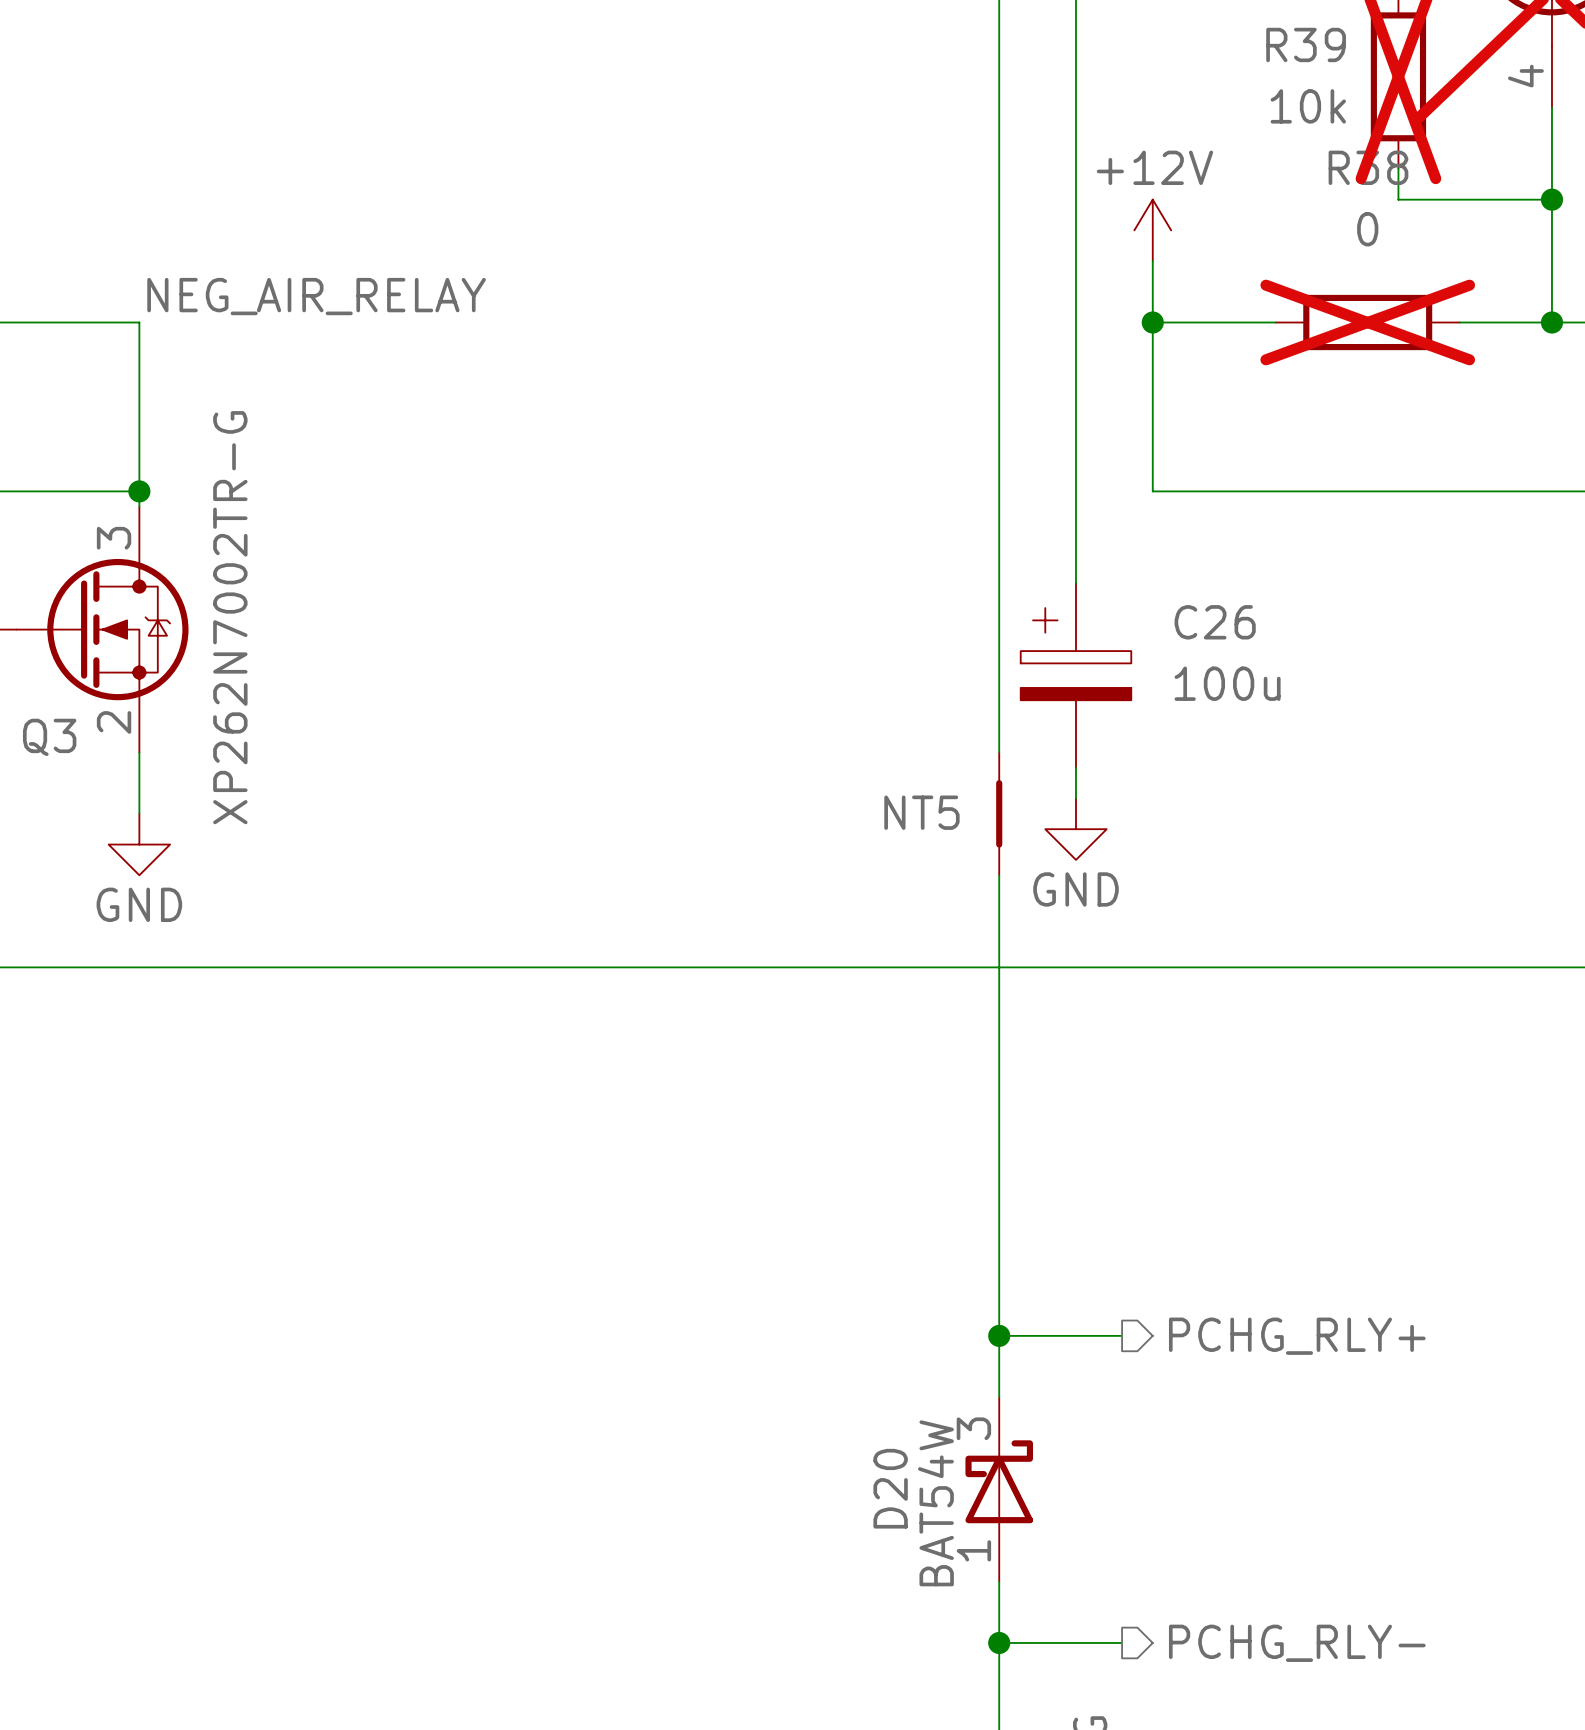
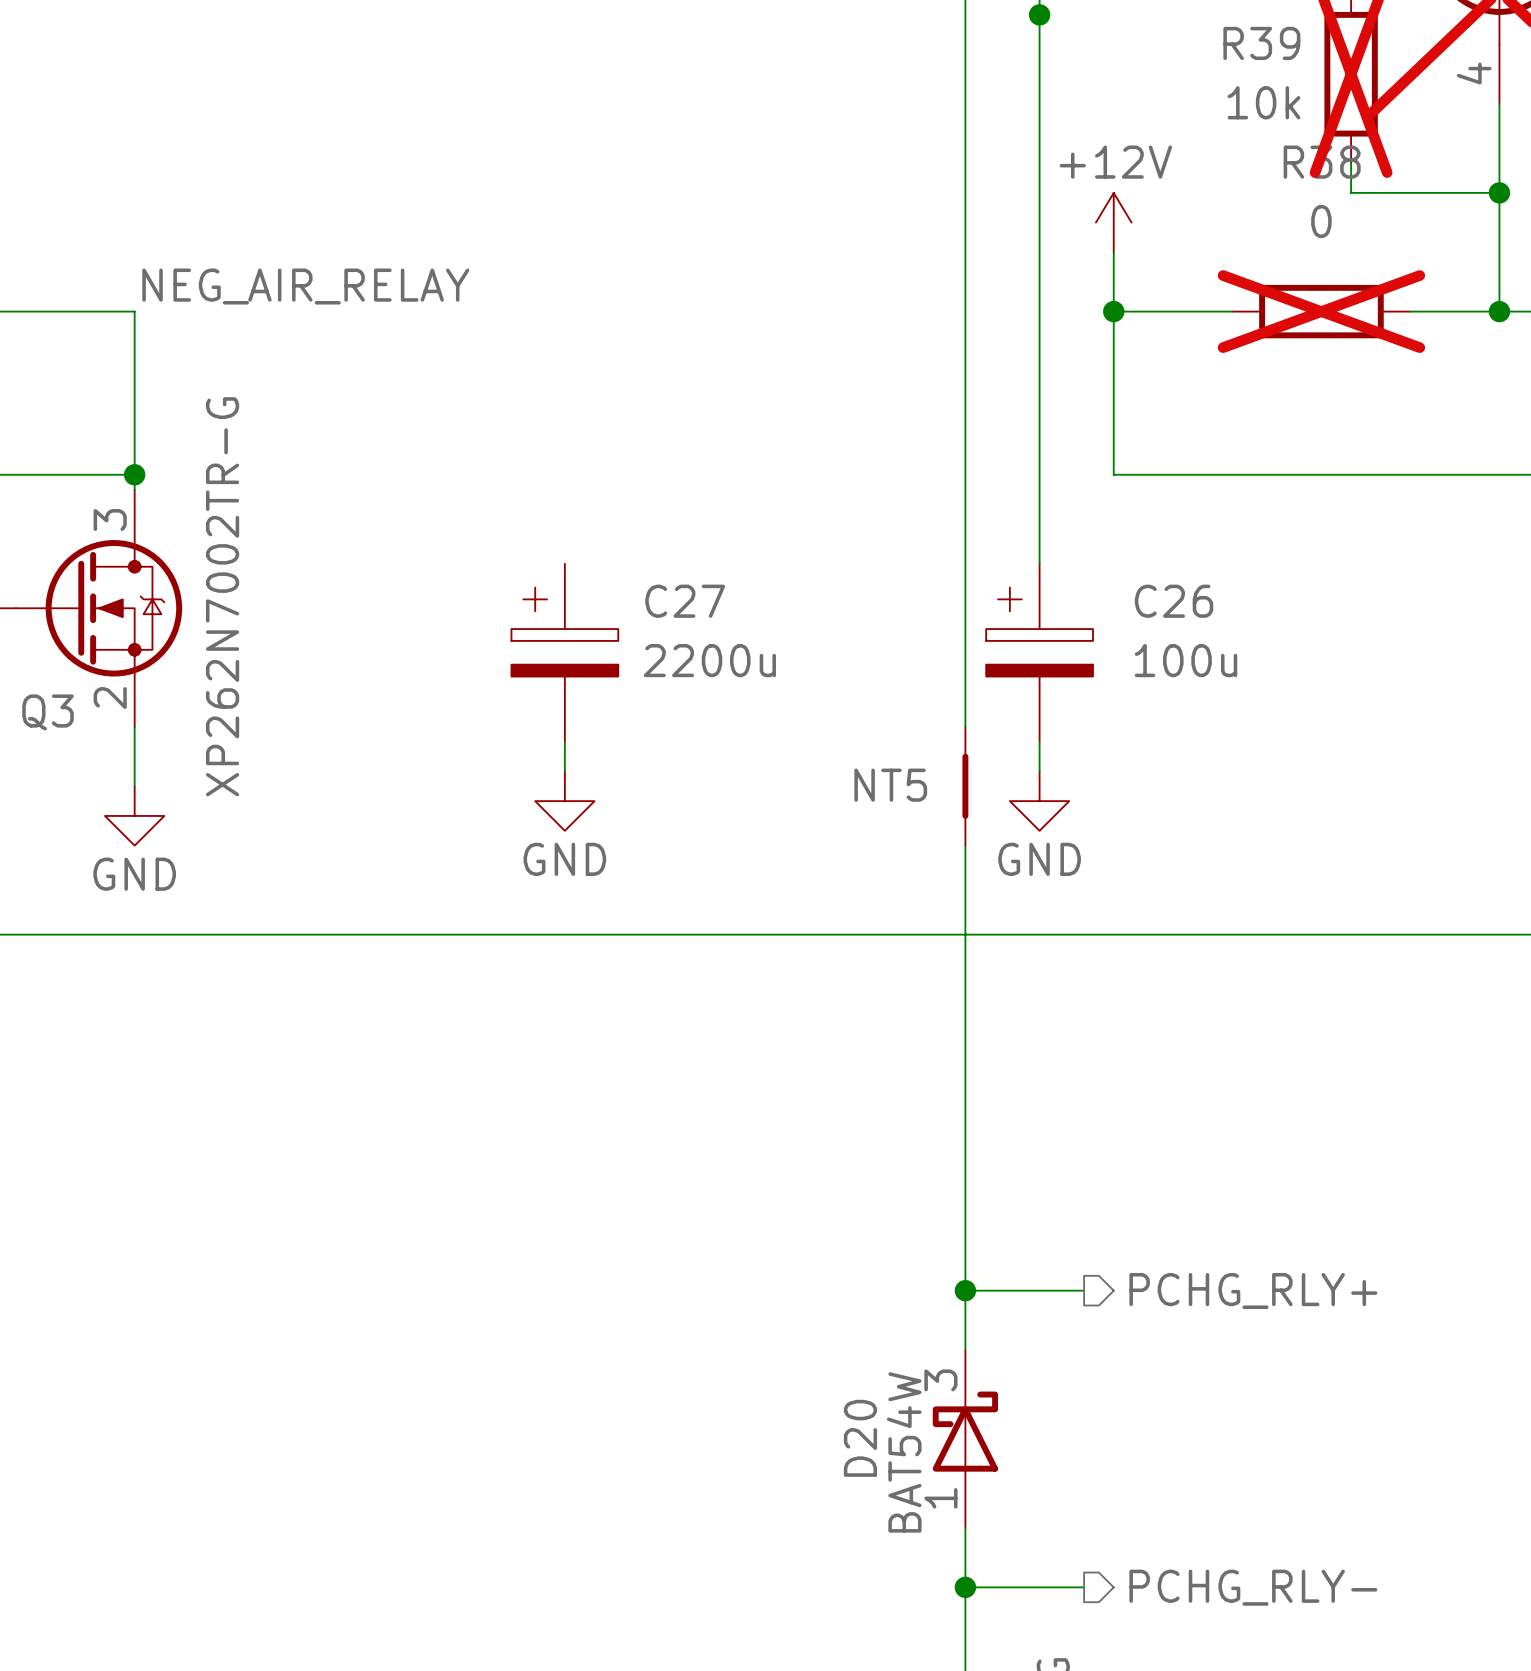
junction: none -> (1039, 14)
C27: none -> 2200u (564, 652)
wire: none -> (564, 741) (564, 771)
power symbol: none -> GND (564, 801)

